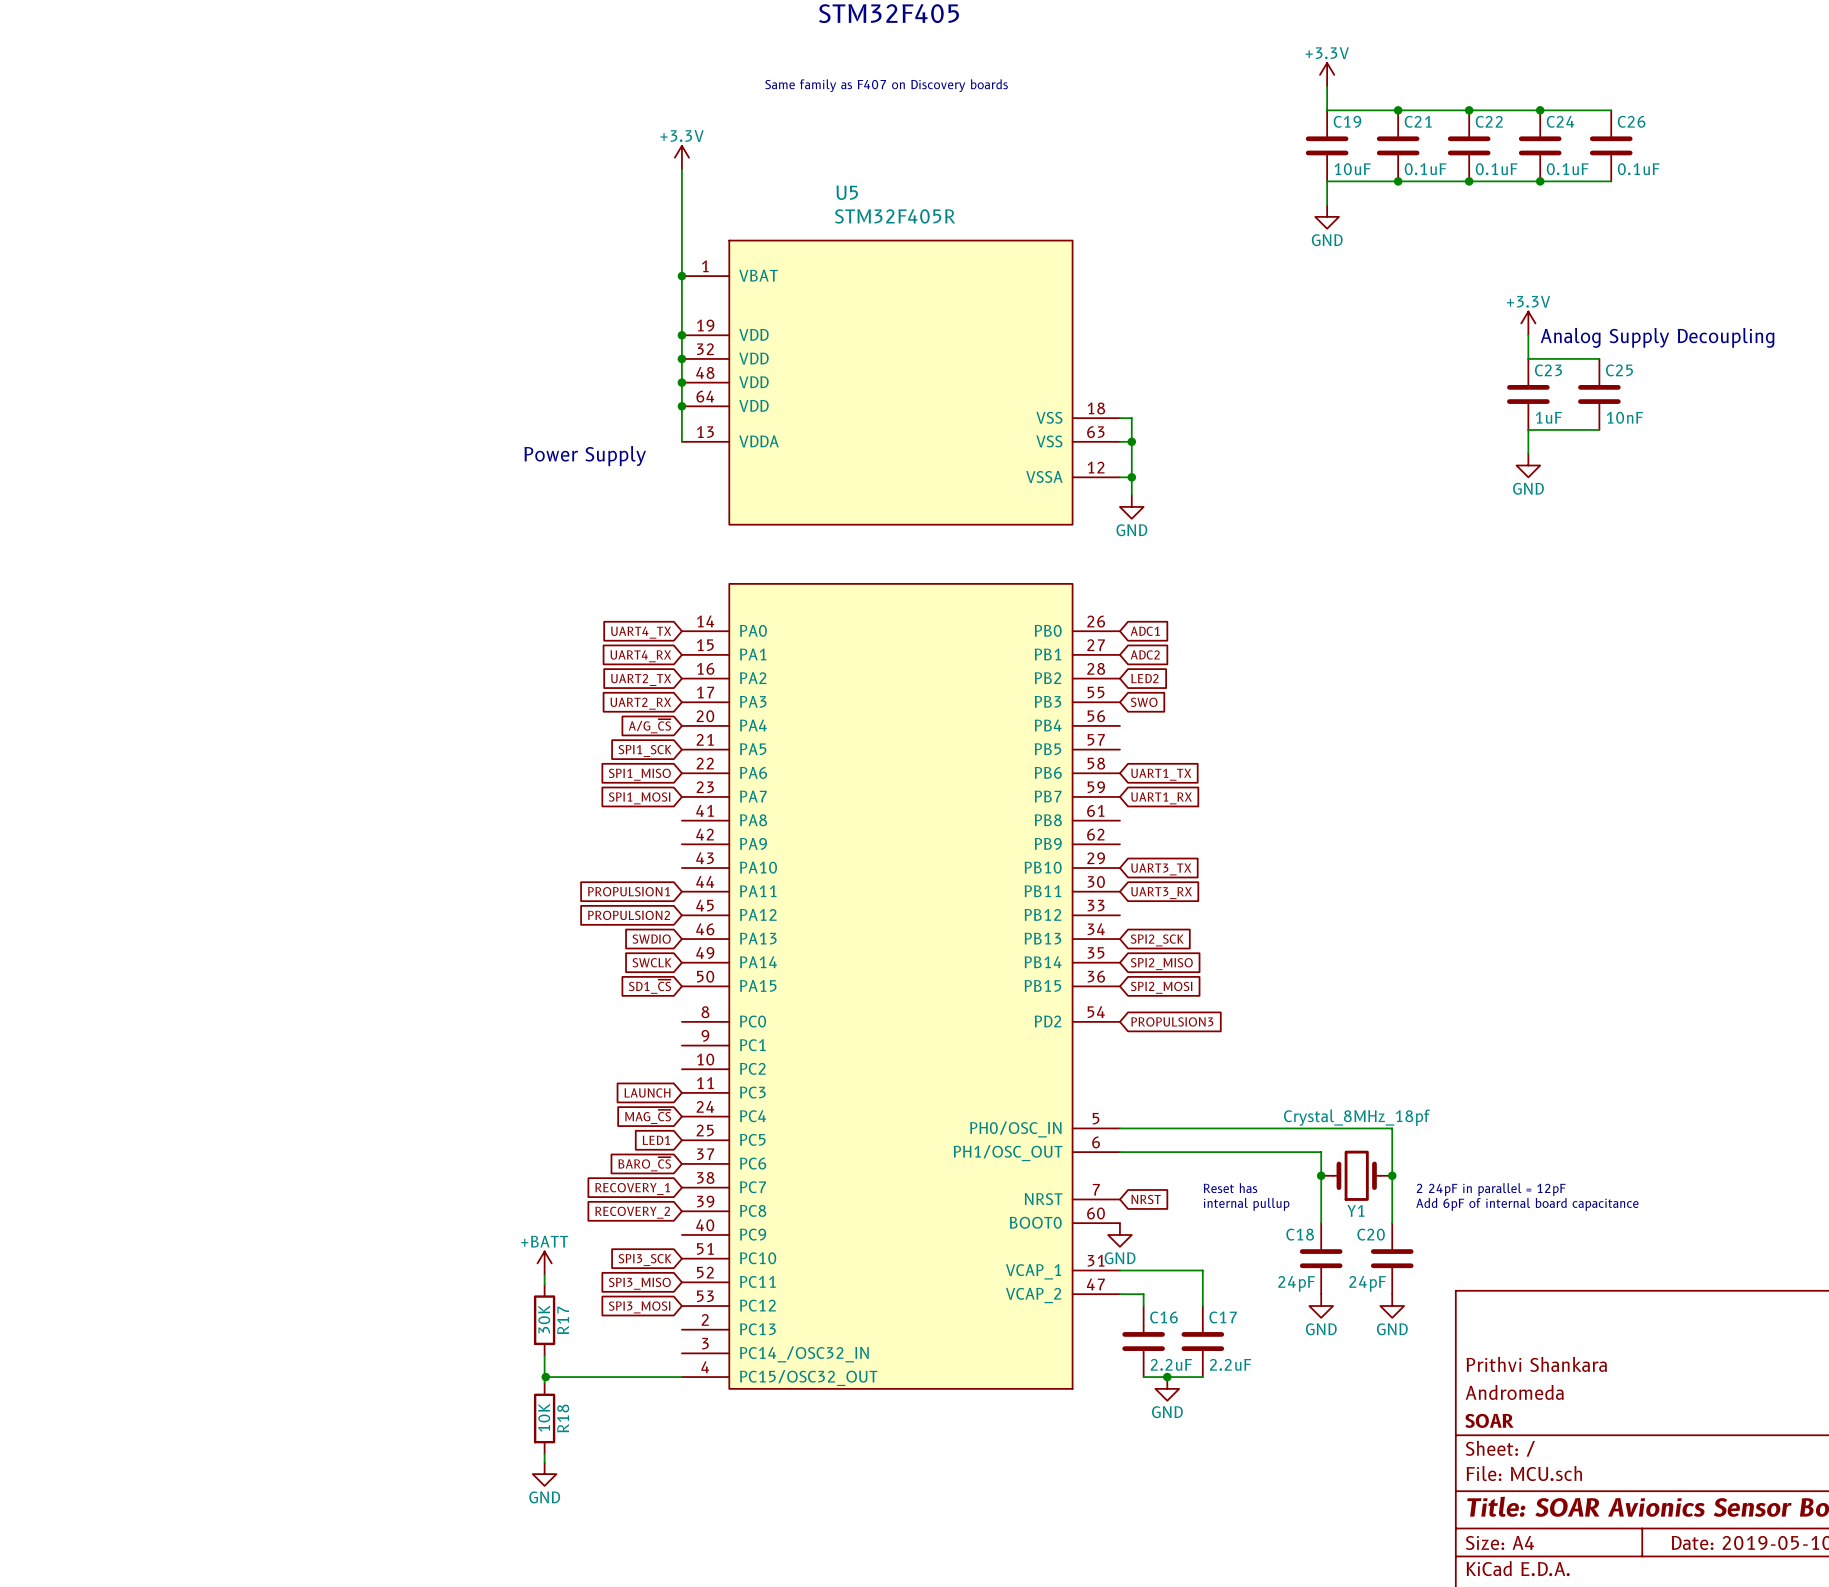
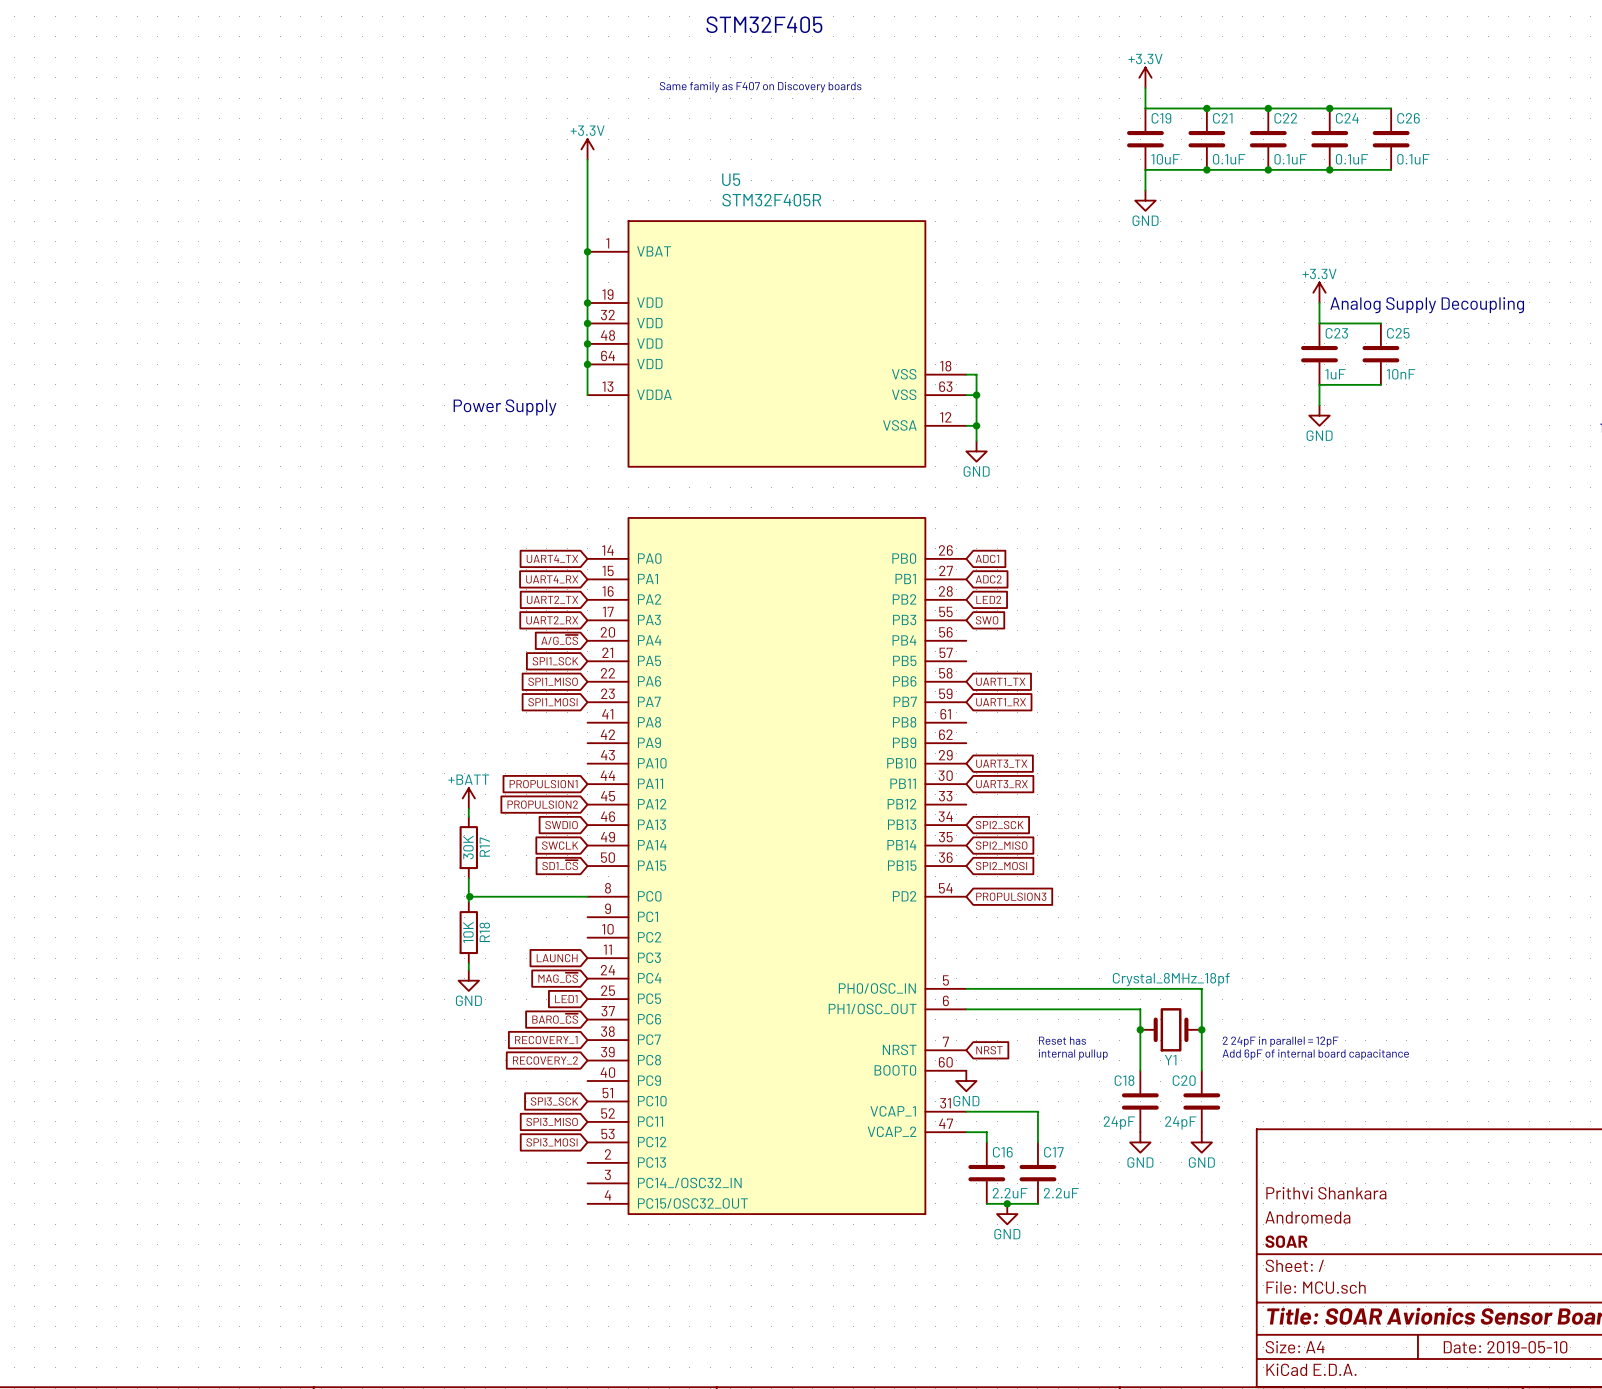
power symbol: none -> +BATT (468, 798)
wire: none -> (468, 808) (468, 816)
wire: none -> (468, 878) (469, 896)
junction: none -> (469, 896)
wire: none -> (587, 896) (468, 896) (468, 901)
wire: none -> (468, 963) (468, 970)
power symbol: none -> GND (468, 980)
power symbol: +BATT (544, 1263) -> none
wire: (544, 1275) (544, 1284) -> none
R17 position: (544, 1320) -> (468, 847)
wire: (544, 1355) (545, 1377) -> none
junction: (545, 1377) -> none
wire: (681, 1377) (544, 1377) (544, 1382) -> none
R18 position: (544, 1418) -> (468, 932)
wire: (544, 1453) (544, 1462) -> none
power symbol: GND (544, 1474) -> none

